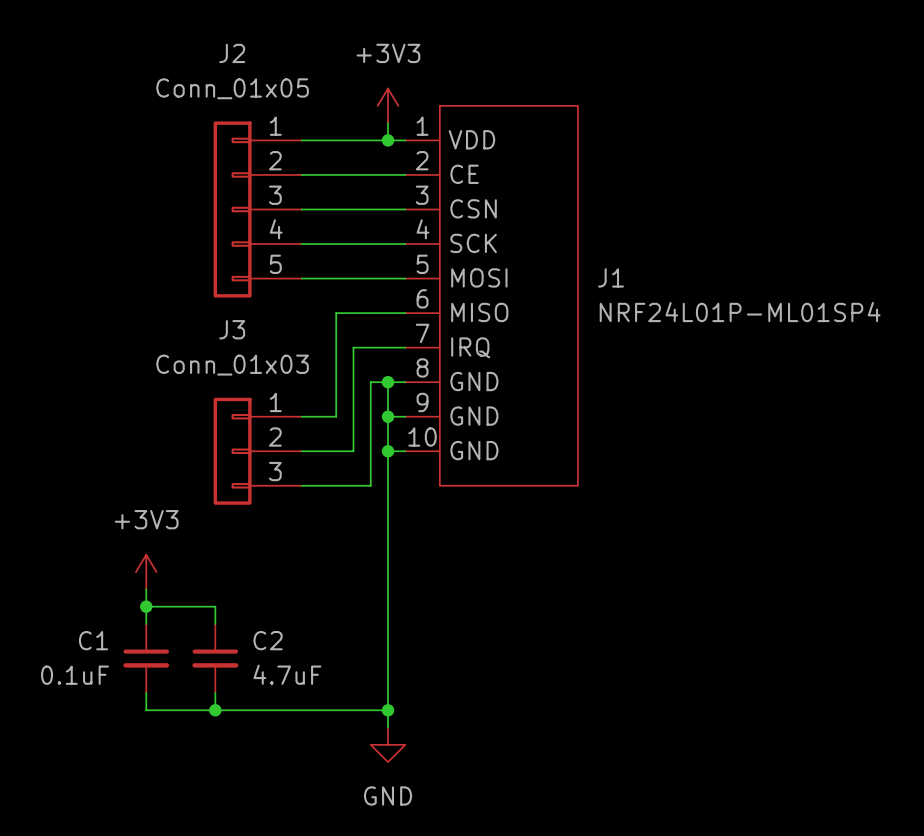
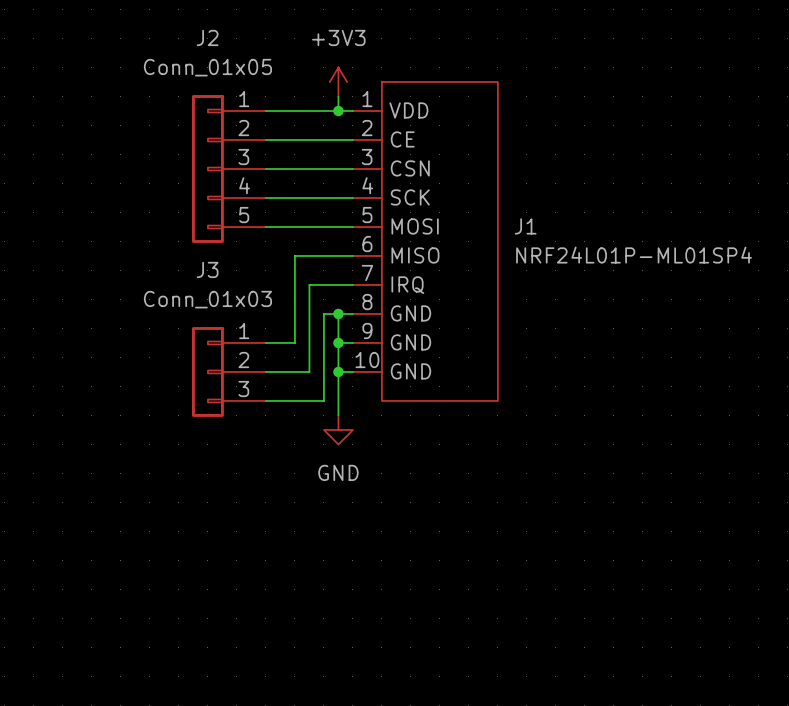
wire: (388, 503) (388, 727) -> none
power symbol: +3V3 (146, 572) -> none
wire: (146, 589) (146, 623) -> none
wire: (146, 606) (215, 606) (215, 623) -> none
junction: (146, 606) -> none
C1: 0.1uF (146, 658) -> none
C2: 4.7uF (215, 658) -> none
wire: (146, 693) (146, 710) (388, 710) -> none
wire: (215, 693) (215, 710) -> none
junction: (215, 710) -> none
junction: (388, 710) -> none
power symbol position: GND (388, 744) -> GND (338, 429)

